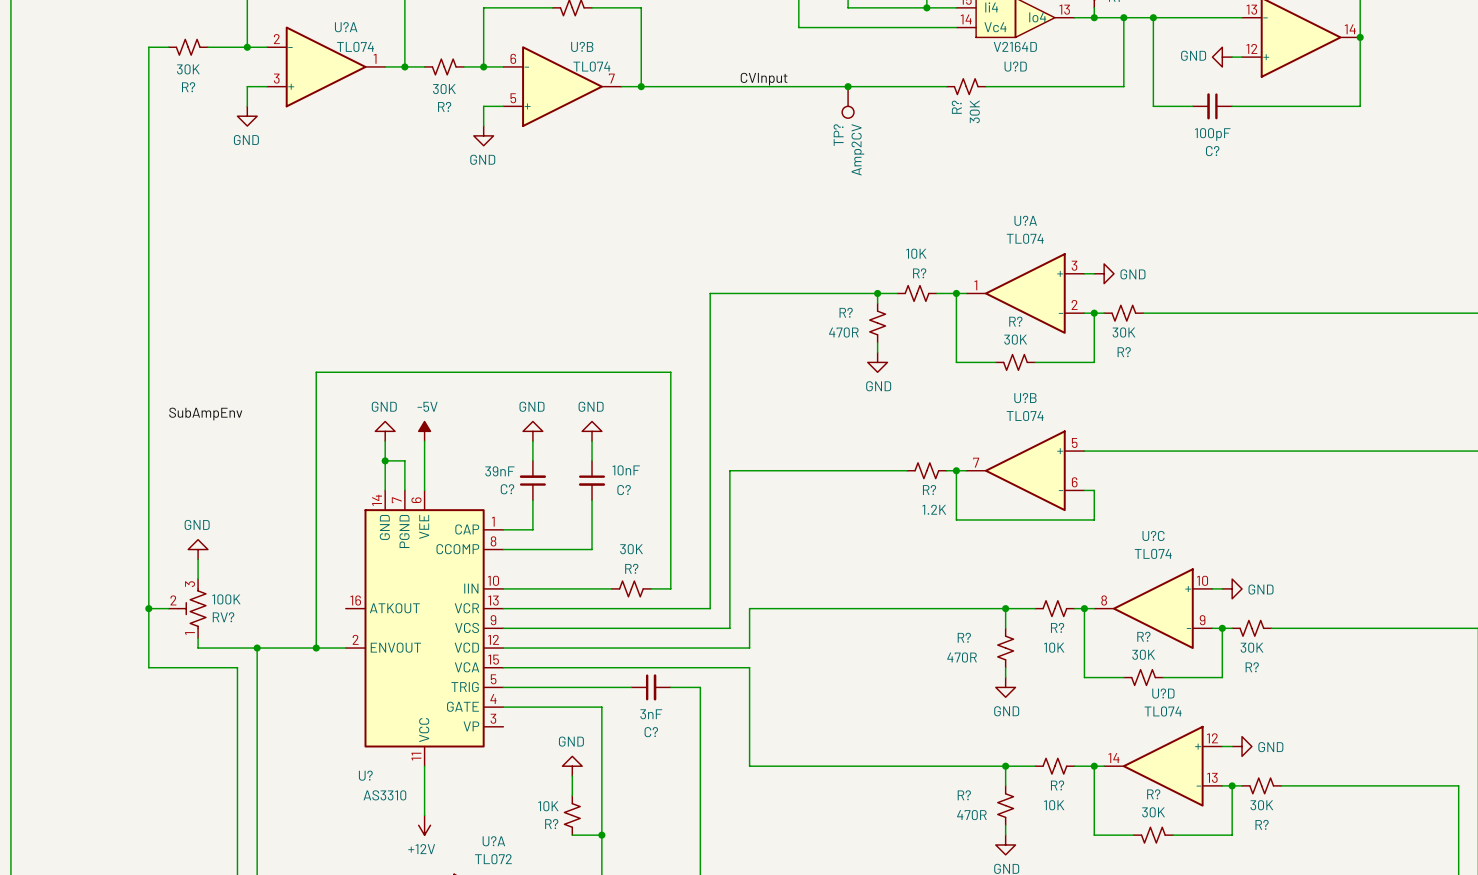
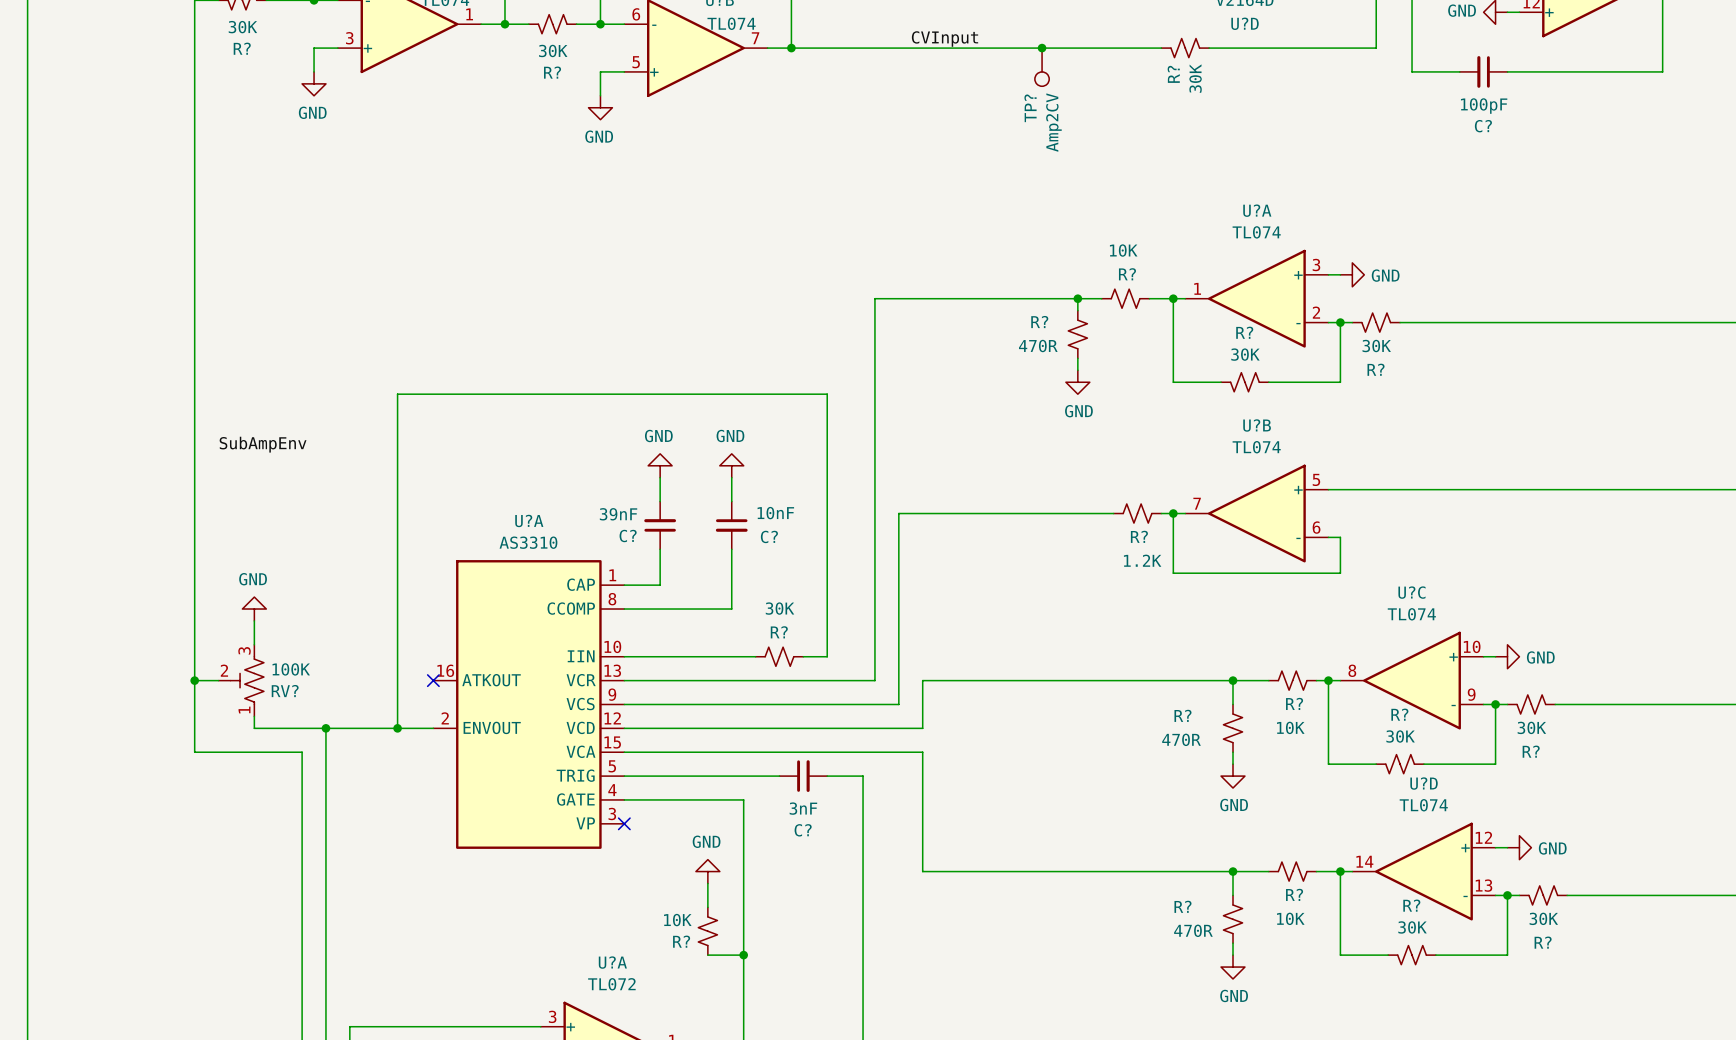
power symbol: GND (385, 431) -> none
power symbol: -5V (424, 431) -> none
wire: (385, 441) (385, 490) -> none
wire: (424, 441) (424, 490) -> none
wire: (385, 460) (404, 460) (404, 490) -> none
junction: (385, 460) -> none
no-connect mark: none -> (433, 680)
U?: AS3310 (424, 628) -> none
U?A: none -> AS3310 (528, 704)
no-connect mark: none -> (624, 823)
wire: (424, 766) (424, 815) -> none
power symbol: +12V (424, 825) -> none

